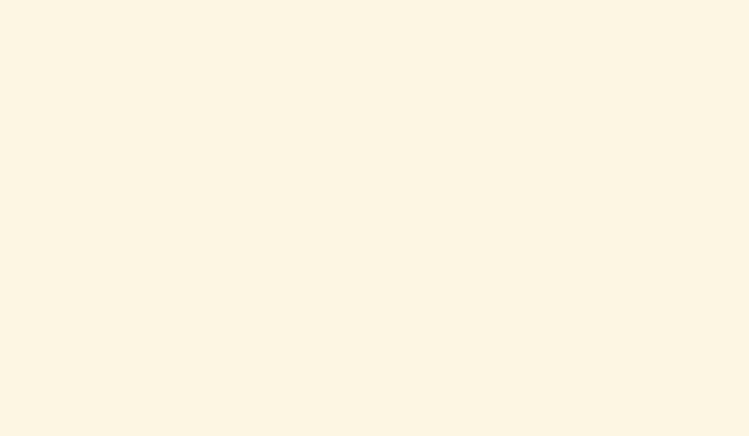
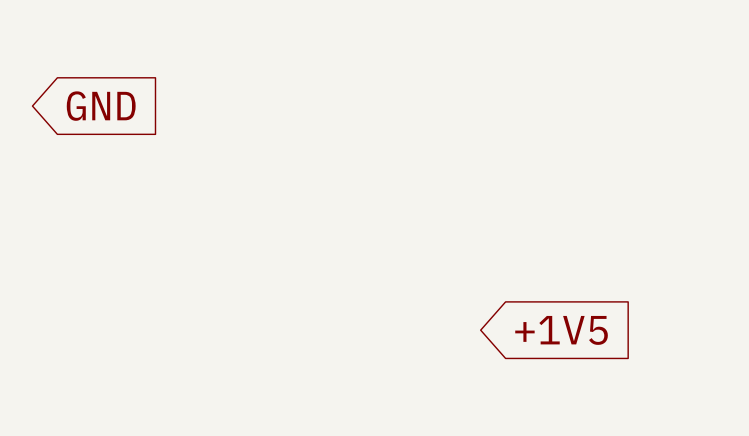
global label: none -> GND (101, 106)
global label: none -> +1V5 (561, 330)

